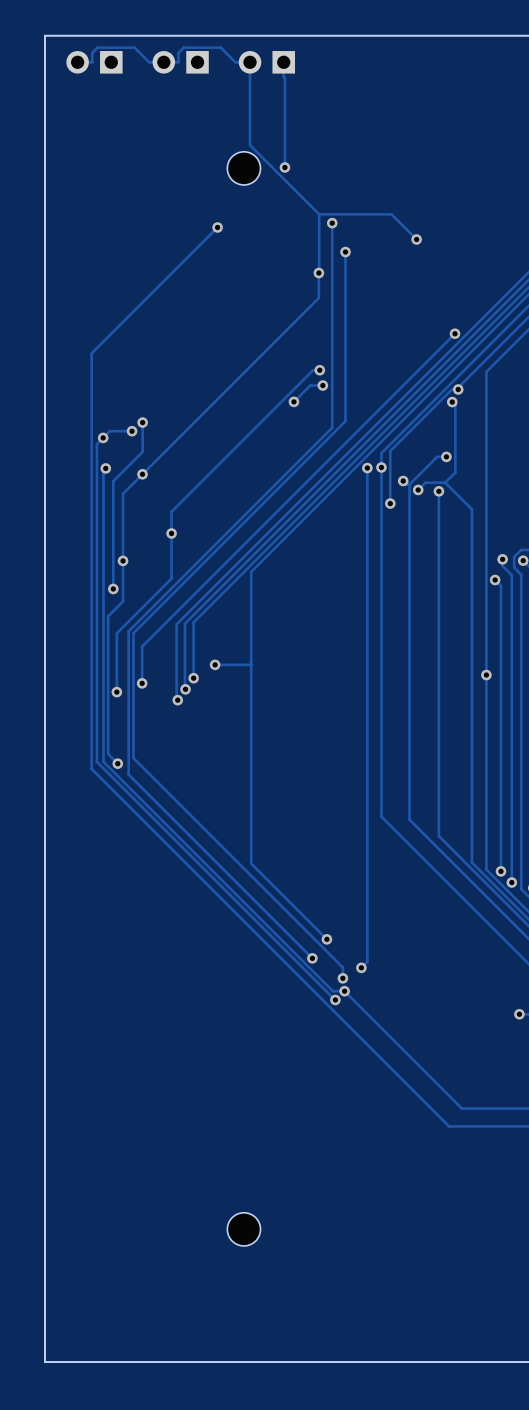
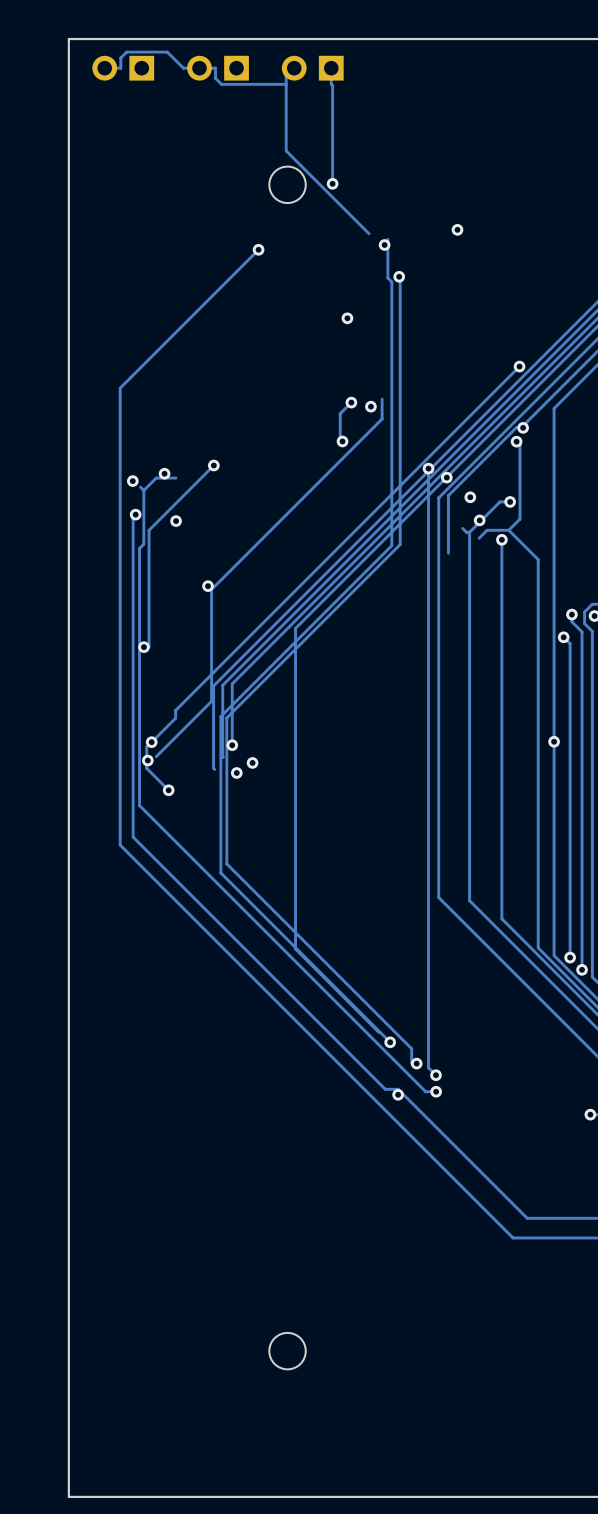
track: (242, 62) (235, 62) (220, 47) (183, 47) (178, 53) (178, 62) -> (286, 84) (221, 84) (215, 78) (215, 68)
track: none -> (286, 68) (286, 150) (369, 233)
track: (250, 62) (250, 145) (319, 214) -> none
track: (319, 214) (391, 214) (416, 239) -> none
track: (319, 214) (318, 297) (123, 493) (123, 601) (108, 616) (108, 754) (117, 763) -> none
track: none -> (387, 239) (387, 277) (391, 281) (391, 545) (220, 716) (220, 873) (390, 1042)
track: (332, 223) (332, 427) (128, 631) (128, 774) (312, 958) -> none
via position: (416, 239) -> (457, 229)
track: (345, 252) (345, 421) (133, 633) (133, 758) (342, 967) (342, 978) -> none
track: none -> (400, 276) (400, 544) (226, 717) (226, 863) (411, 1048) (411, 1063)
via position: (318, 273) -> (347, 318)
track: none -> (382, 399) (382, 418) (211, 589) (211, 701) (156, 756)
track: none -> (351, 402) (340, 413) (340, 440)
track: (319, 370) (313, 370) (171, 511) (171, 578) (116, 633) (116, 692) -> none
track: (322, 385) (310, 385) (293, 401) -> none
via position: (322, 385) -> (351, 402)
track: (142, 422) (142, 451) (113, 481) (113, 588) -> none
via position: (142, 422) -> (213, 465)
track: none -> (213, 465) (149, 530) (149, 647)
track: none -> (428, 468) (428, 1067) (435, 1075)
via: none -> (428, 468)
track: (132, 431) (109, 431) (96, 444) (96, 761) (335, 999) -> none
via: none -> (446, 477)
track: none -> (175, 478) (156, 478) (143, 490)
track: none -> (140, 487) (143, 490)
track: none -> (143, 490) (143, 544) (139, 548) (139, 805) (425, 1091) (436, 1091)
via: none -> (470, 497)
via: (381, 467) -> none
track: (367, 468) (367, 961) (361, 967) -> none
via: (367, 468) -> none
via: none -> (479, 520)
via: (403, 481) -> none
via: (418, 489) -> none
via: (390, 503) -> none
via: (123, 560) -> none
track: (142, 646) (142, 683) -> (175, 710) (175, 718) (146, 747) (146, 768) (168, 790)
via: (215, 664) -> none
track: (251, 664) (215, 664) -> none
via: none -> (151, 742)
via: (142, 683) -> none
via: (185, 689) -> none
via: none -> (252, 762)
via: (177, 700) -> none
via: none -> (236, 772)
via: none -> (168, 790)
via: (117, 763) -> none
via: (326, 939) -> none
via: none -> (390, 1042)
via: (312, 958) -> none
via: (342, 978) -> none
via: none -> (435, 1075)
via: (344, 991) -> none
via: none -> (436, 1091)
via: none -> (398, 1094)
via: (335, 999) -> none

